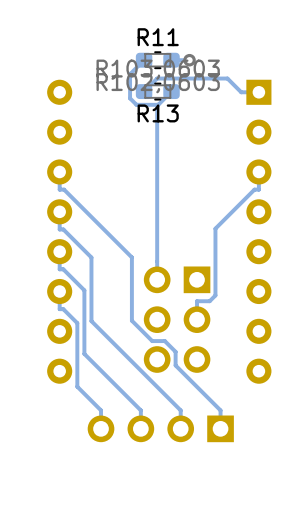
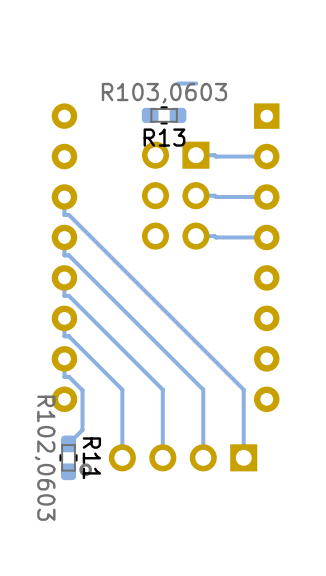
track: (144, 60) (130, 74) (130, 98) (136, 104) (158, 104) (171, 91) -> none
R11 rotation: 0° (157, 60) -> 90° clockwise (68, 457)
R11 position: (157, 60) -> (68, 457)
via: (189, 60) -> none
track: (144, 91) (157, 78) (227, 78) (241, 92) (258, 92) -> none
track: (157, 104) (157, 279) -> none
track: none -> (195, 155) (266, 156)
track: (258, 171) (258, 189) (254, 189) (215, 228) (215, 295) (209, 301) (197, 301) (197, 319) -> (266, 197) (195, 195)
track: none -> (195, 236) (266, 237)
track: (63, 229) (91, 257) (91, 321) (180, 410) (180, 428) -> (68, 255) (203, 389) (203, 457)
track: (131, 257) (131, 320) (152, 341) (164, 341) (175, 351) (175, 365) (220, 410) (220, 428) -> (137, 283) (243, 389) (243, 457)
track: (63, 269) (84, 290) (84, 353) (140, 410) (140, 428) -> (68, 295) (162, 389) (162, 457)
track: (63, 309) (77, 323) (77, 386) (101, 410) (101, 428) -> (68, 336) (122, 389) (122, 457)
part position: (177, 319) -> (175, 195)
track: none -> (64, 358) (64, 376) (68, 376) (82, 390) (82, 429) (68, 443)
part position: (160, 428) -> (183, 457)
via: none -> (85, 469)

